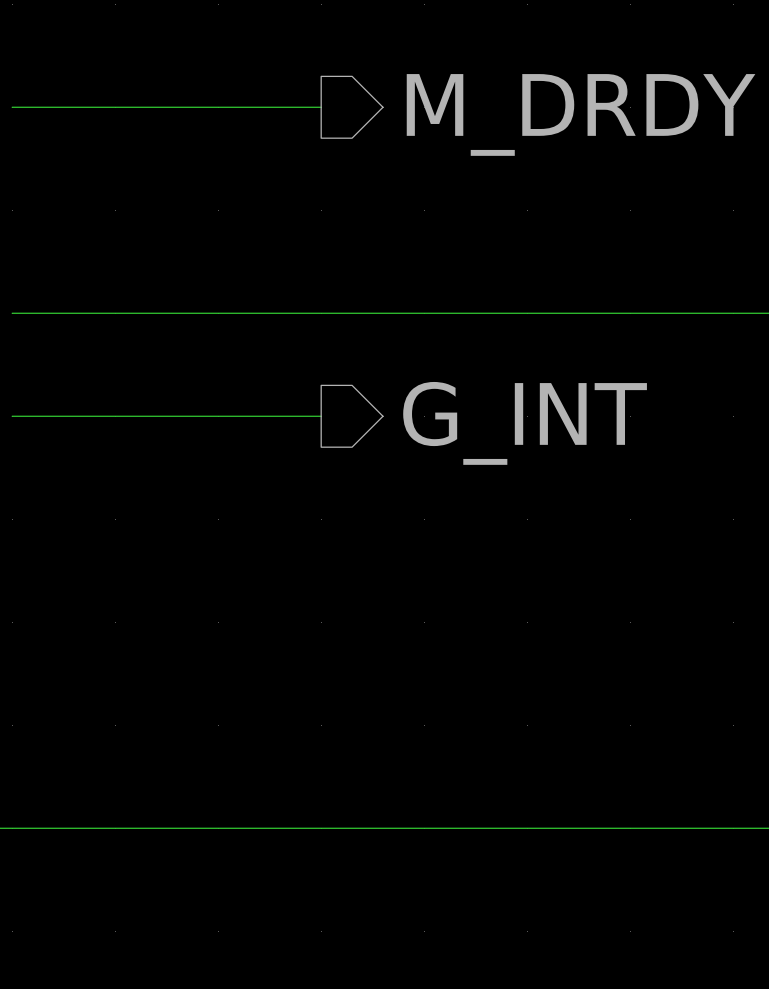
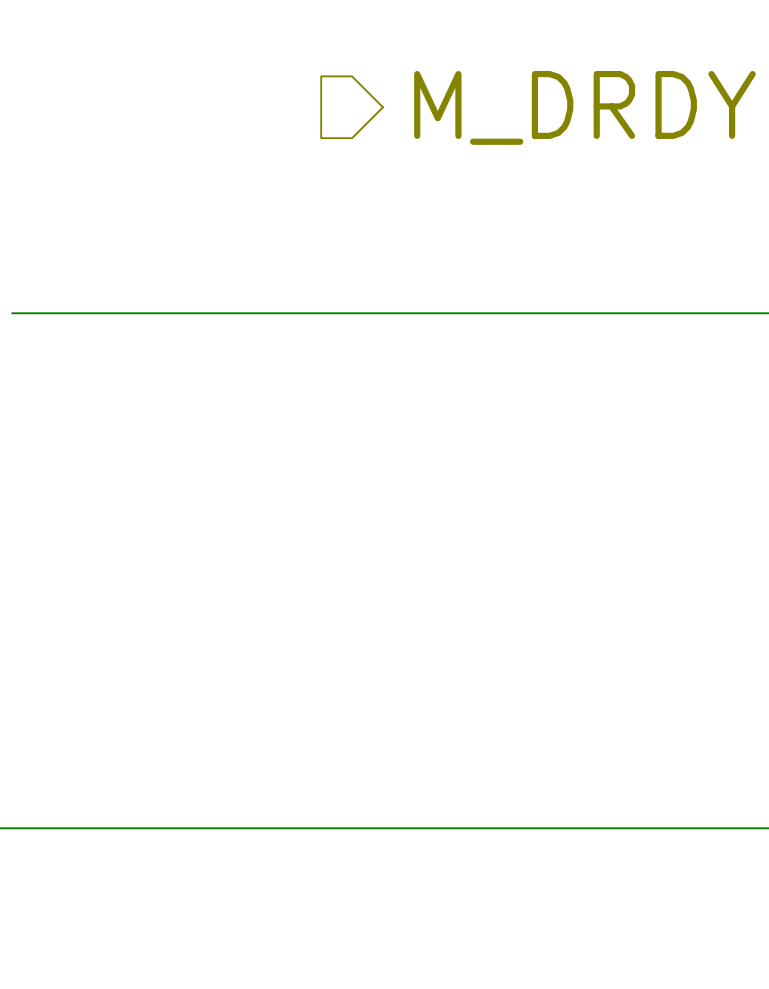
wire: (12, 107) (321, 107) -> none
wire: (12, 416) (321, 416) -> none
hierarchical label: G_INT (525, 423) -> none

